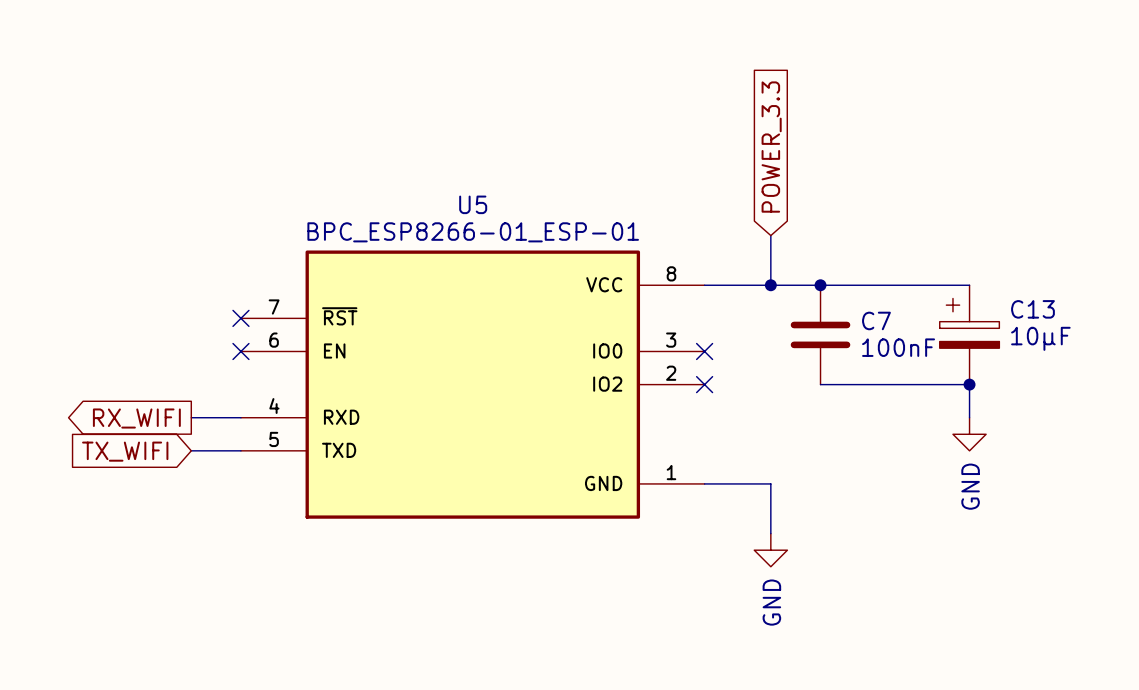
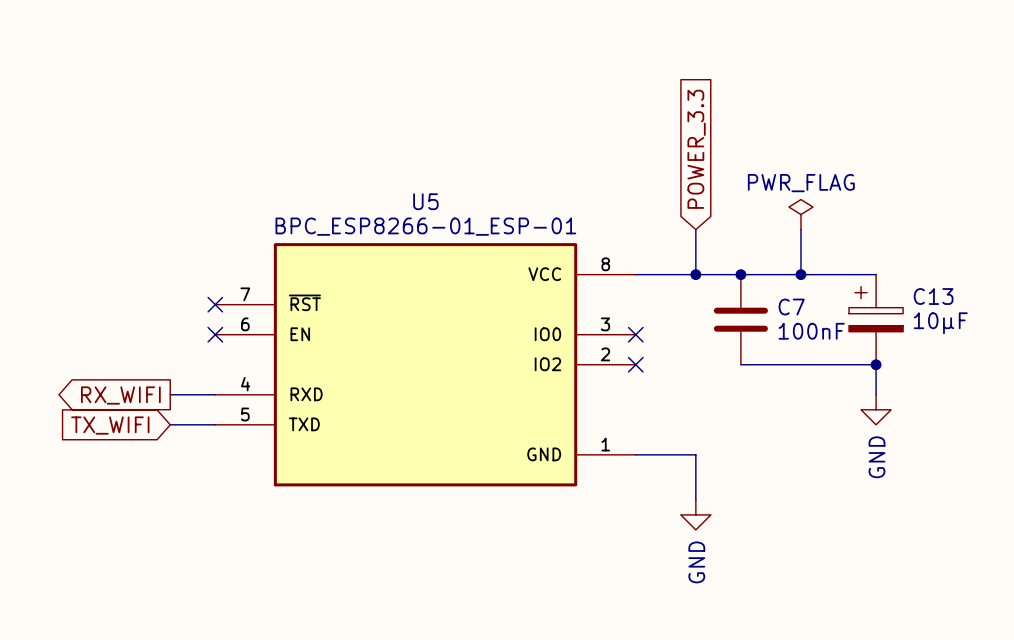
power symbol: none -> PWR_FLAG (800, 214)
wire: none -> (800, 229) (800, 274)
junction: none -> (800, 274)

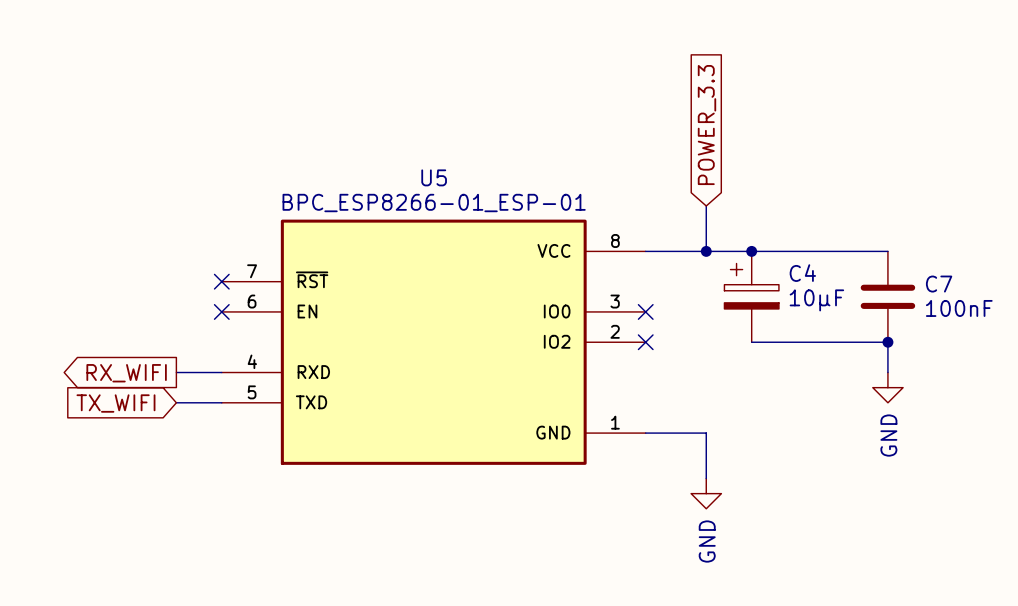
power symbol: PWR_FLAG (800, 214) -> none
wire: (800, 229) (800, 274) -> none
junction: (800, 274) -> none
C7 position: (740, 319) -> (887, 296)
C4: none -> 10µF (751, 296)
C13: 10µF (876, 319) -> none

